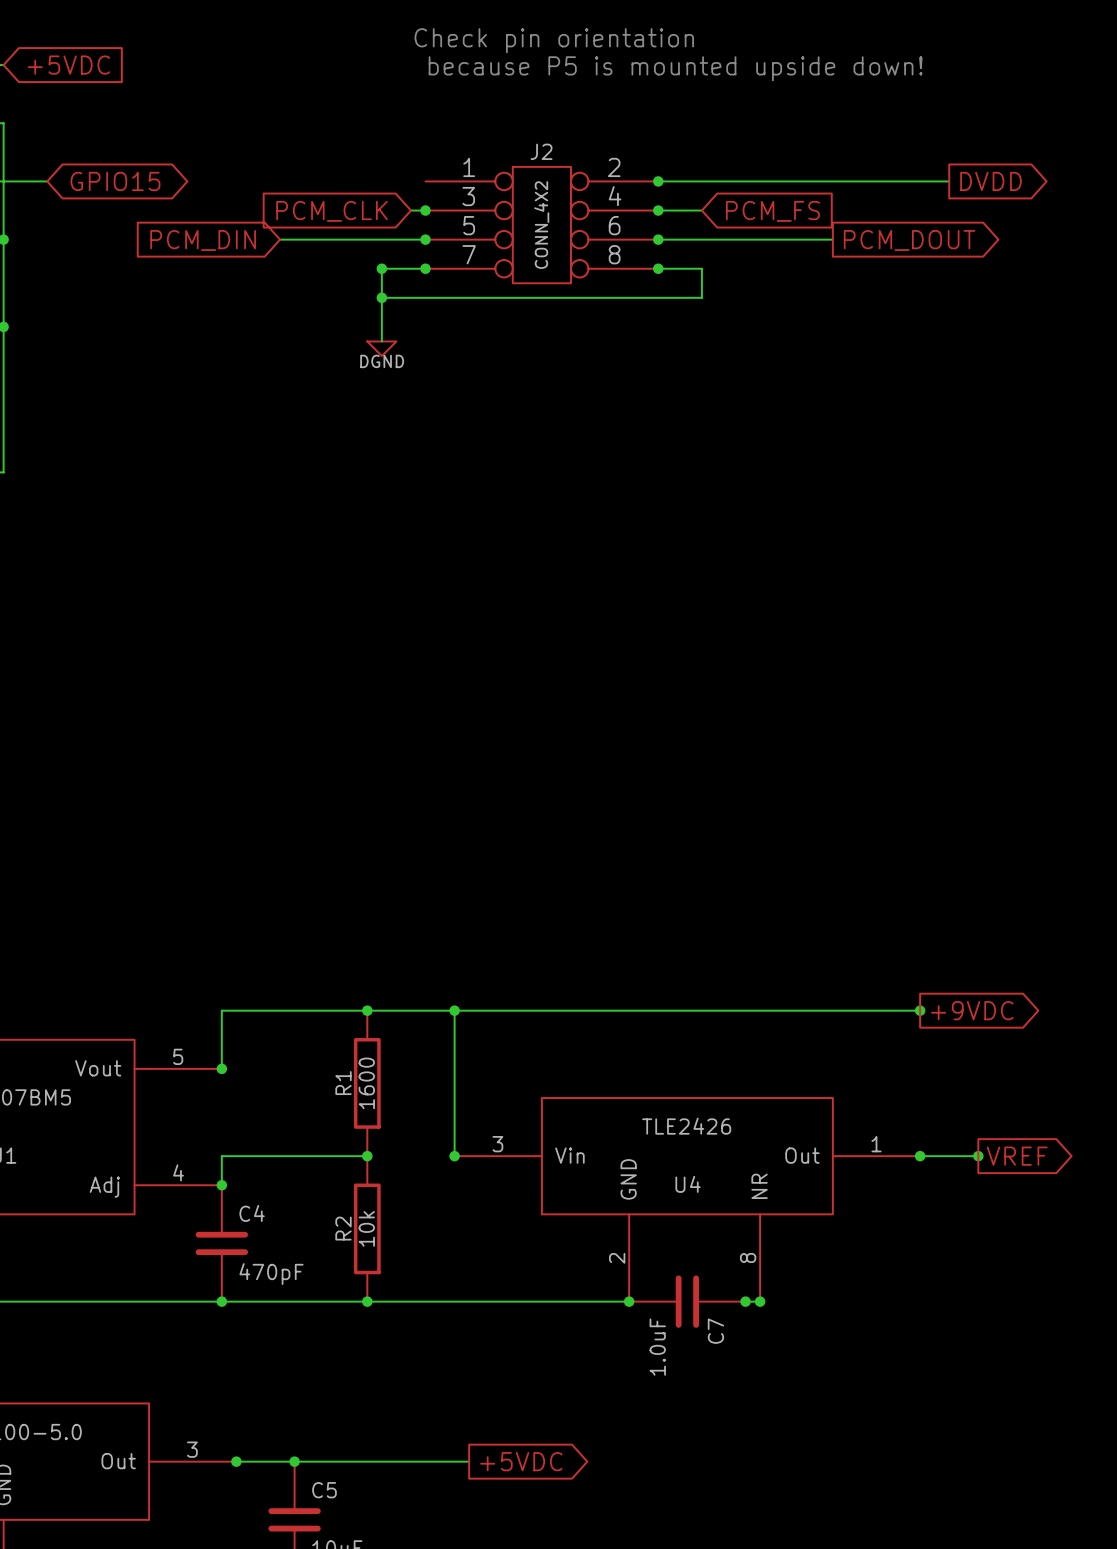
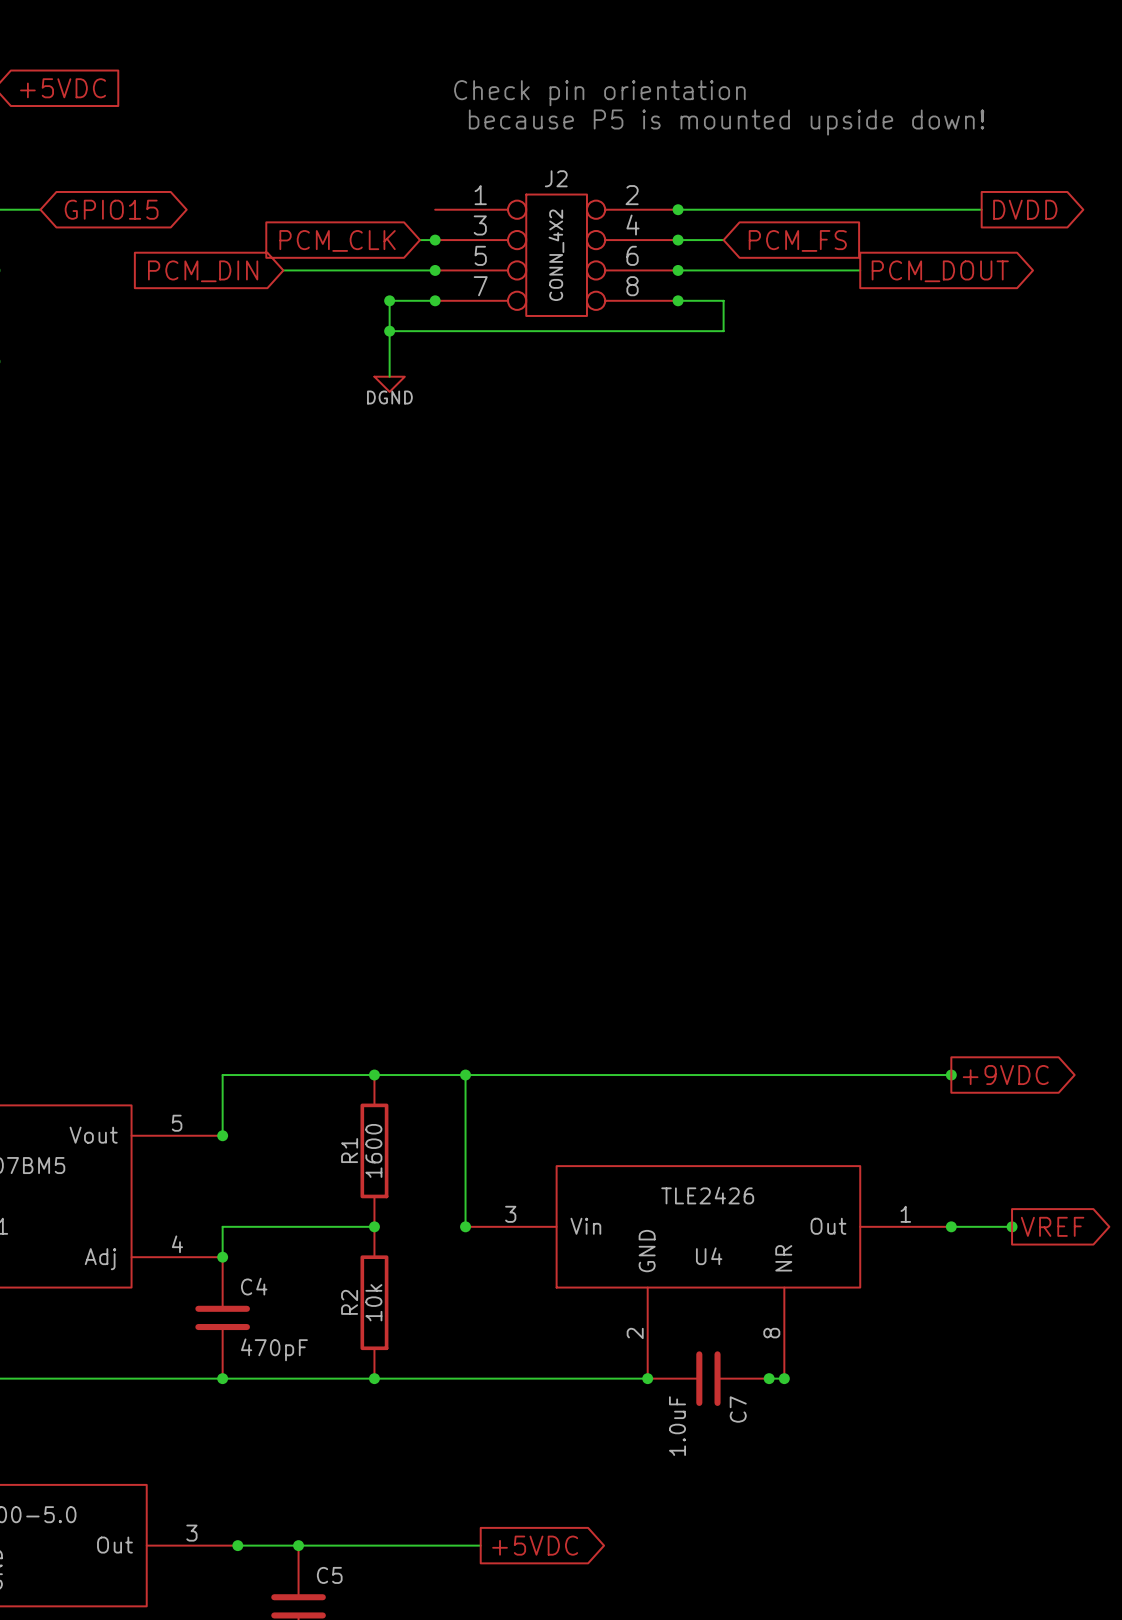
text position: Check pin orientation (554, 40) -> Check pin orientation (599, 93)
text position: because P5 is mounted upside down! (675, 68) -> because P5 is mounted upside down! (726, 122)

